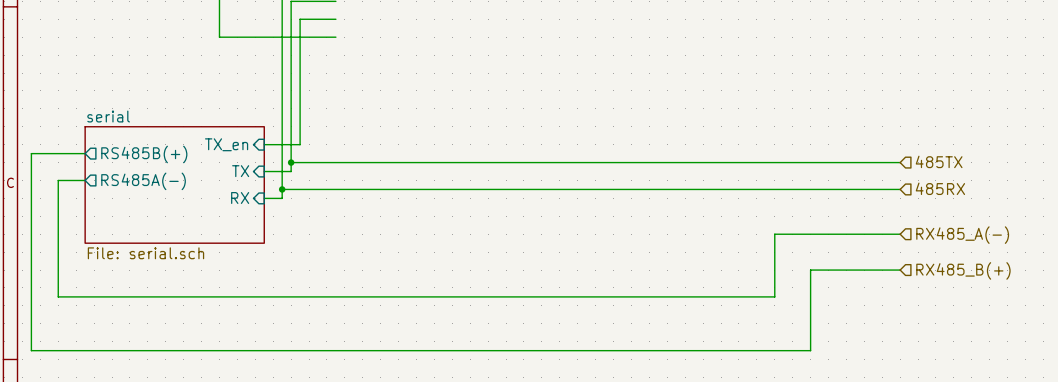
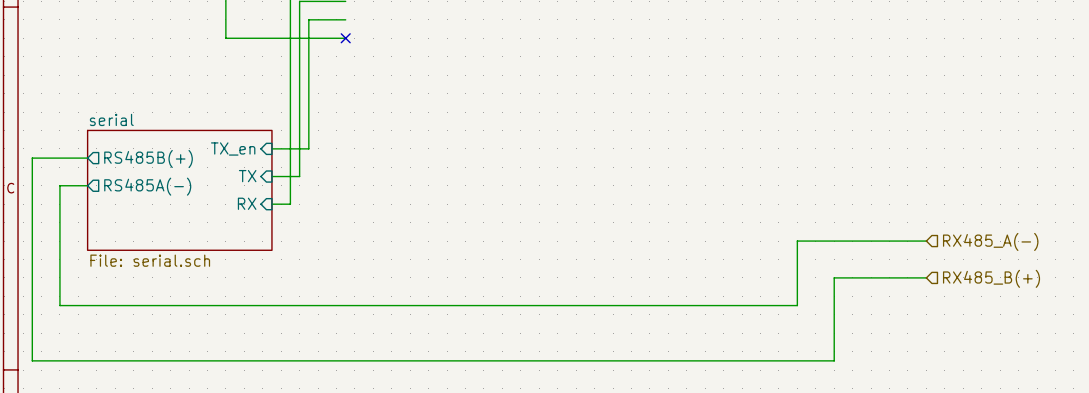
no-connect mark: none -> (345, 38)
hierarchical label: 485TX (939, 161) -> none
wire: (291, 162) (900, 162) -> none
junction: (291, 162) -> none
hierarchical label: 485RX (940, 188) -> none
wire: (282, 189) (900, 189) -> none
junction: (282, 189) -> none

